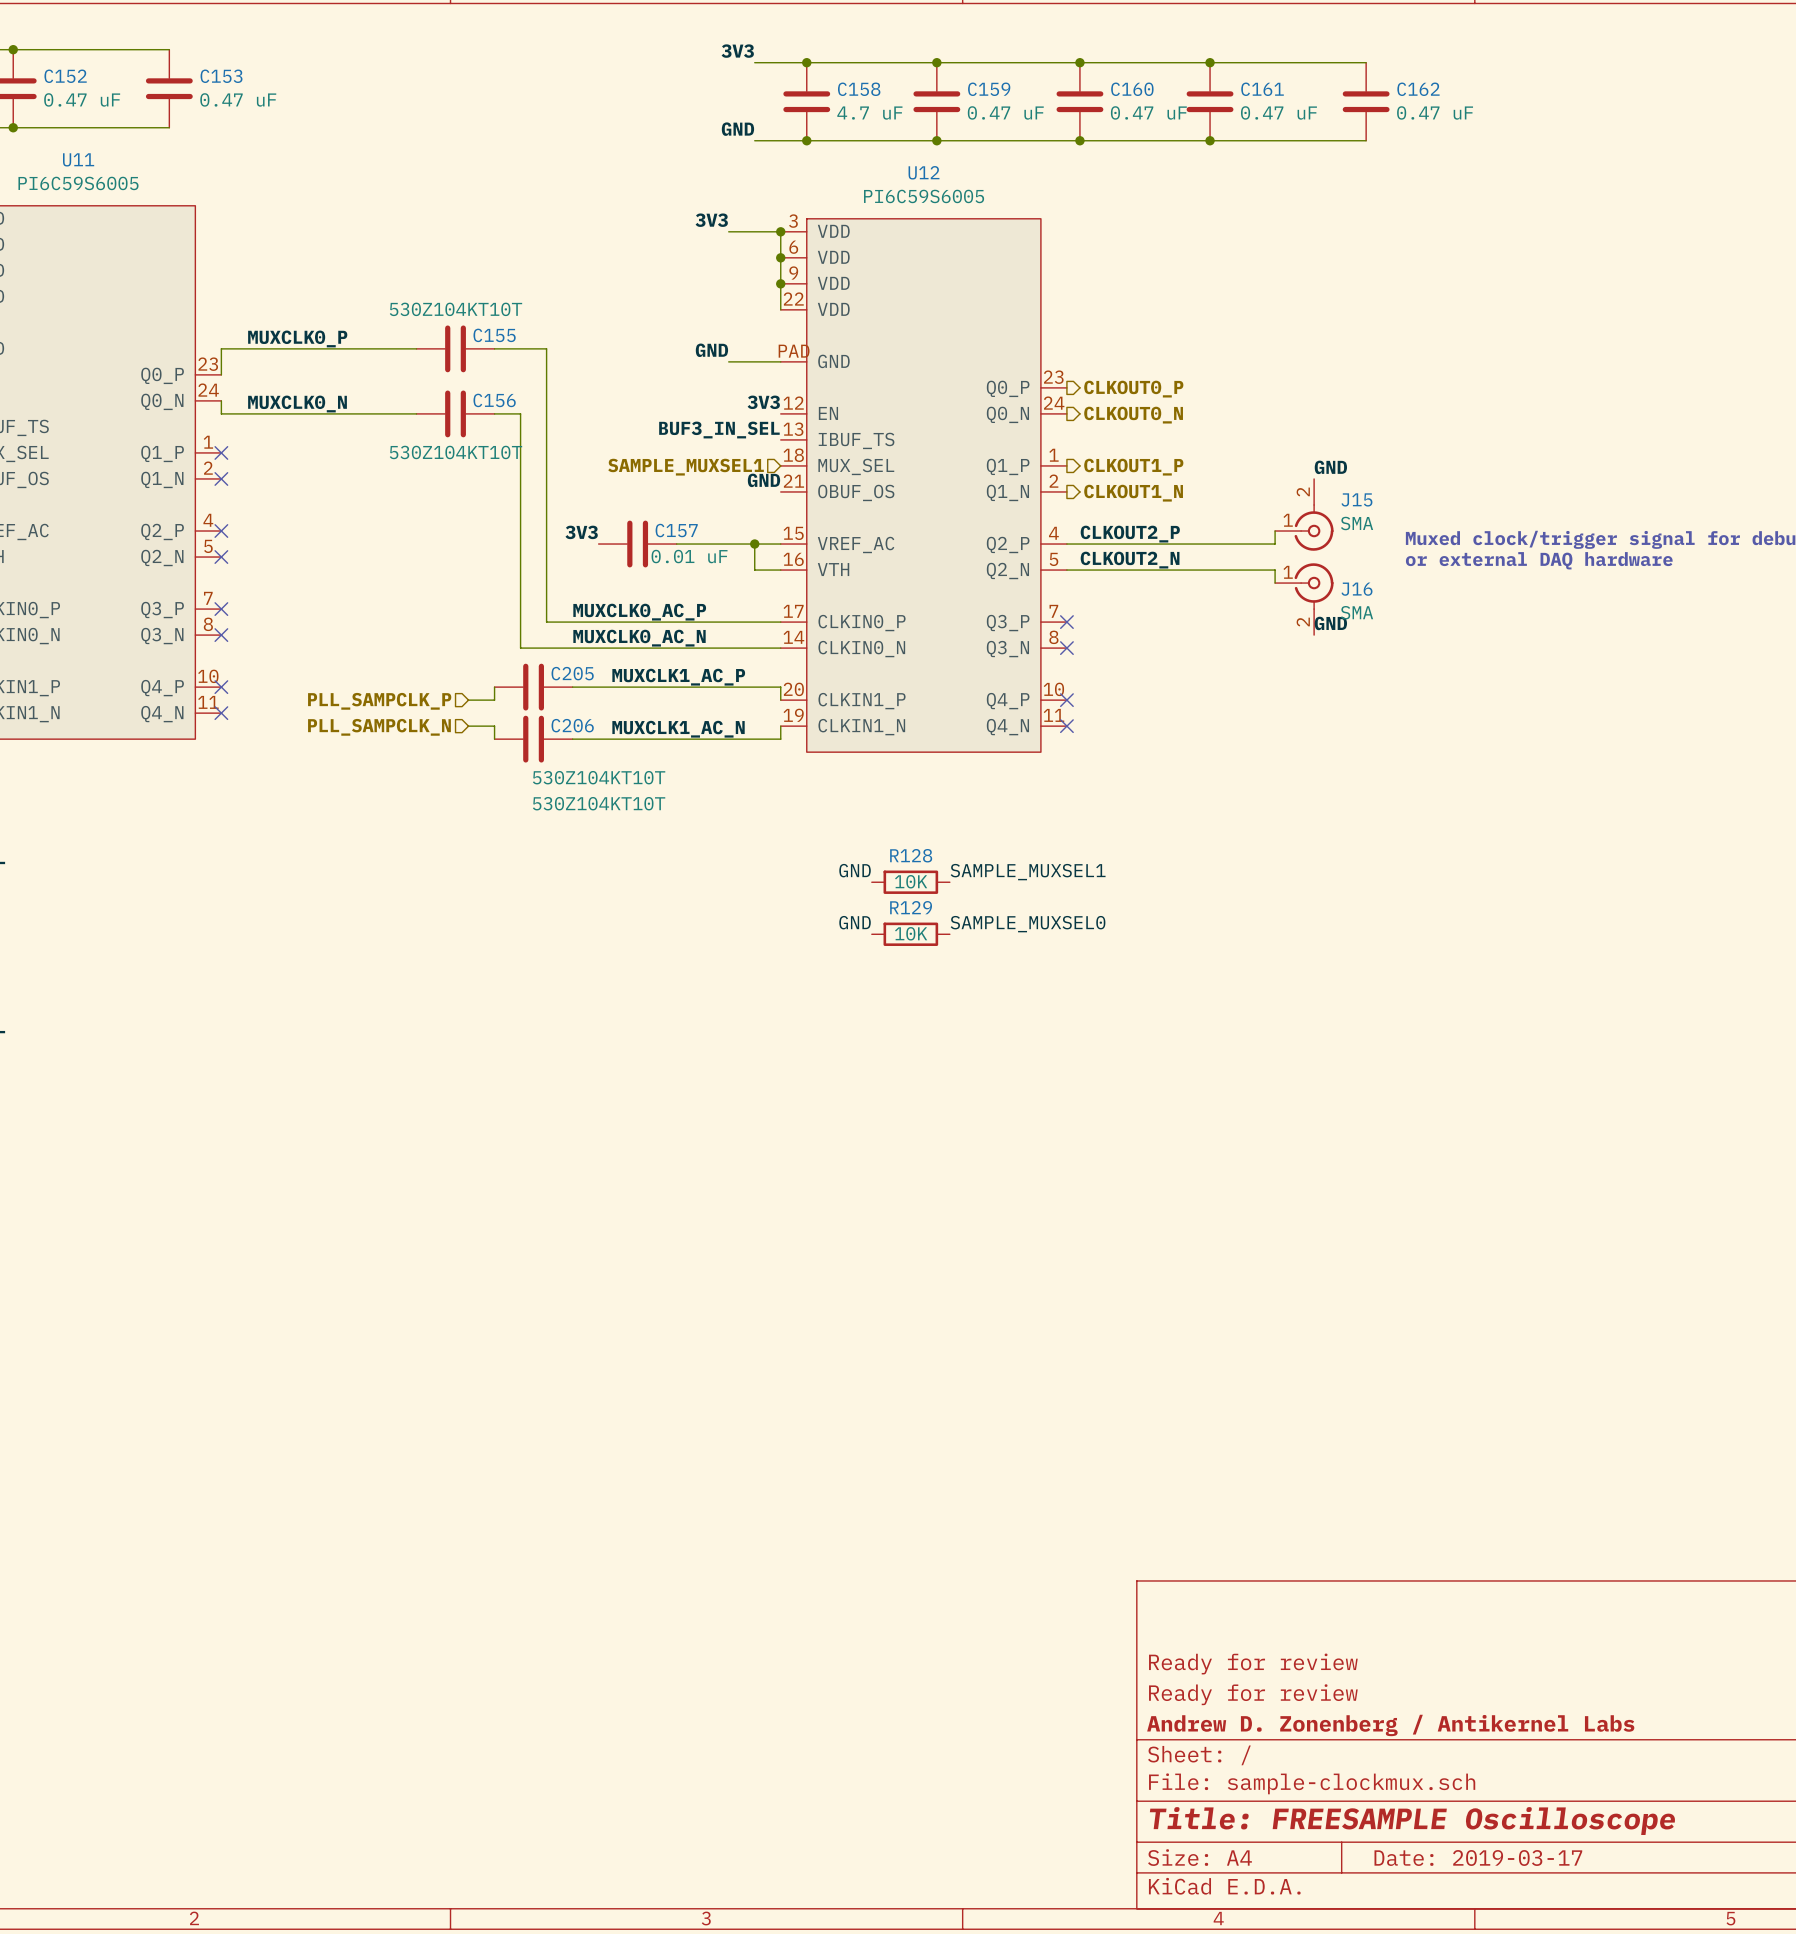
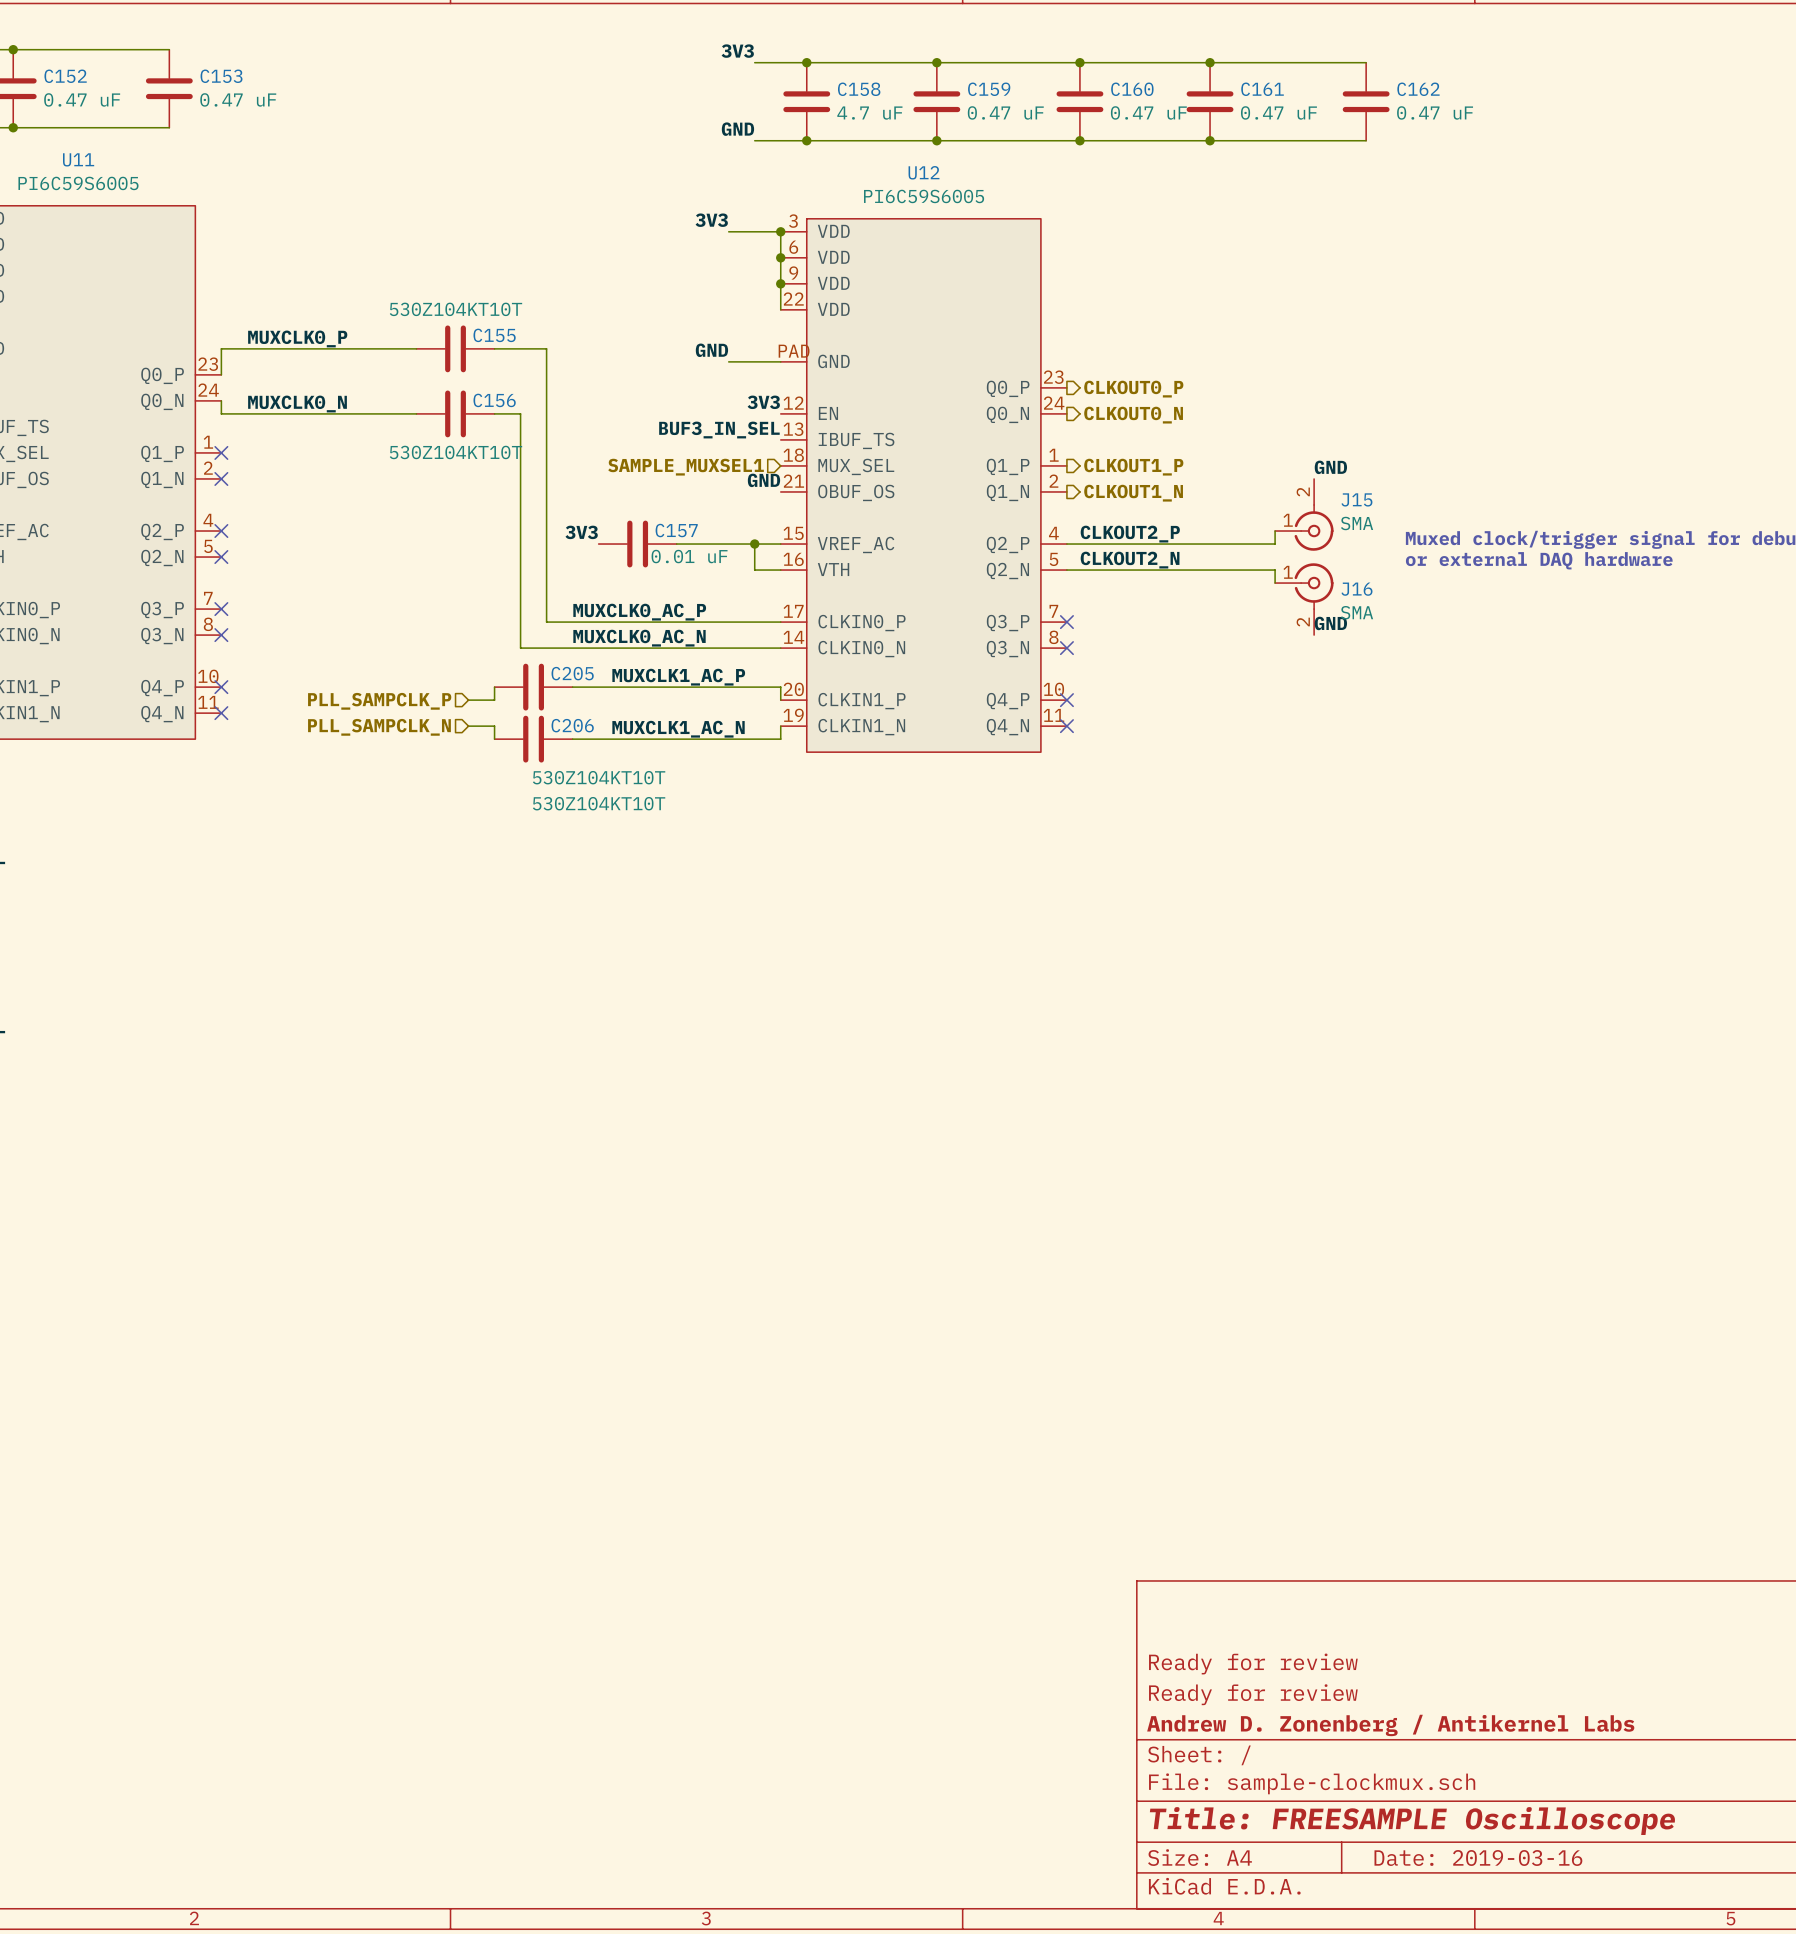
label: GND (855, 870) -> none
label: SAMPLE_MUXSEL1 (1028, 872) -> none
R128: 10K (910, 882) -> none
label: GND (855, 922) -> none
label: SAMPLE_MUXSEL0 (1028, 924) -> none
R129: 10K (910, 934) -> none
title block: Date: 2019-03-17 (1478, 1858) -> Date: 2019-03-16 (1478, 1858)

